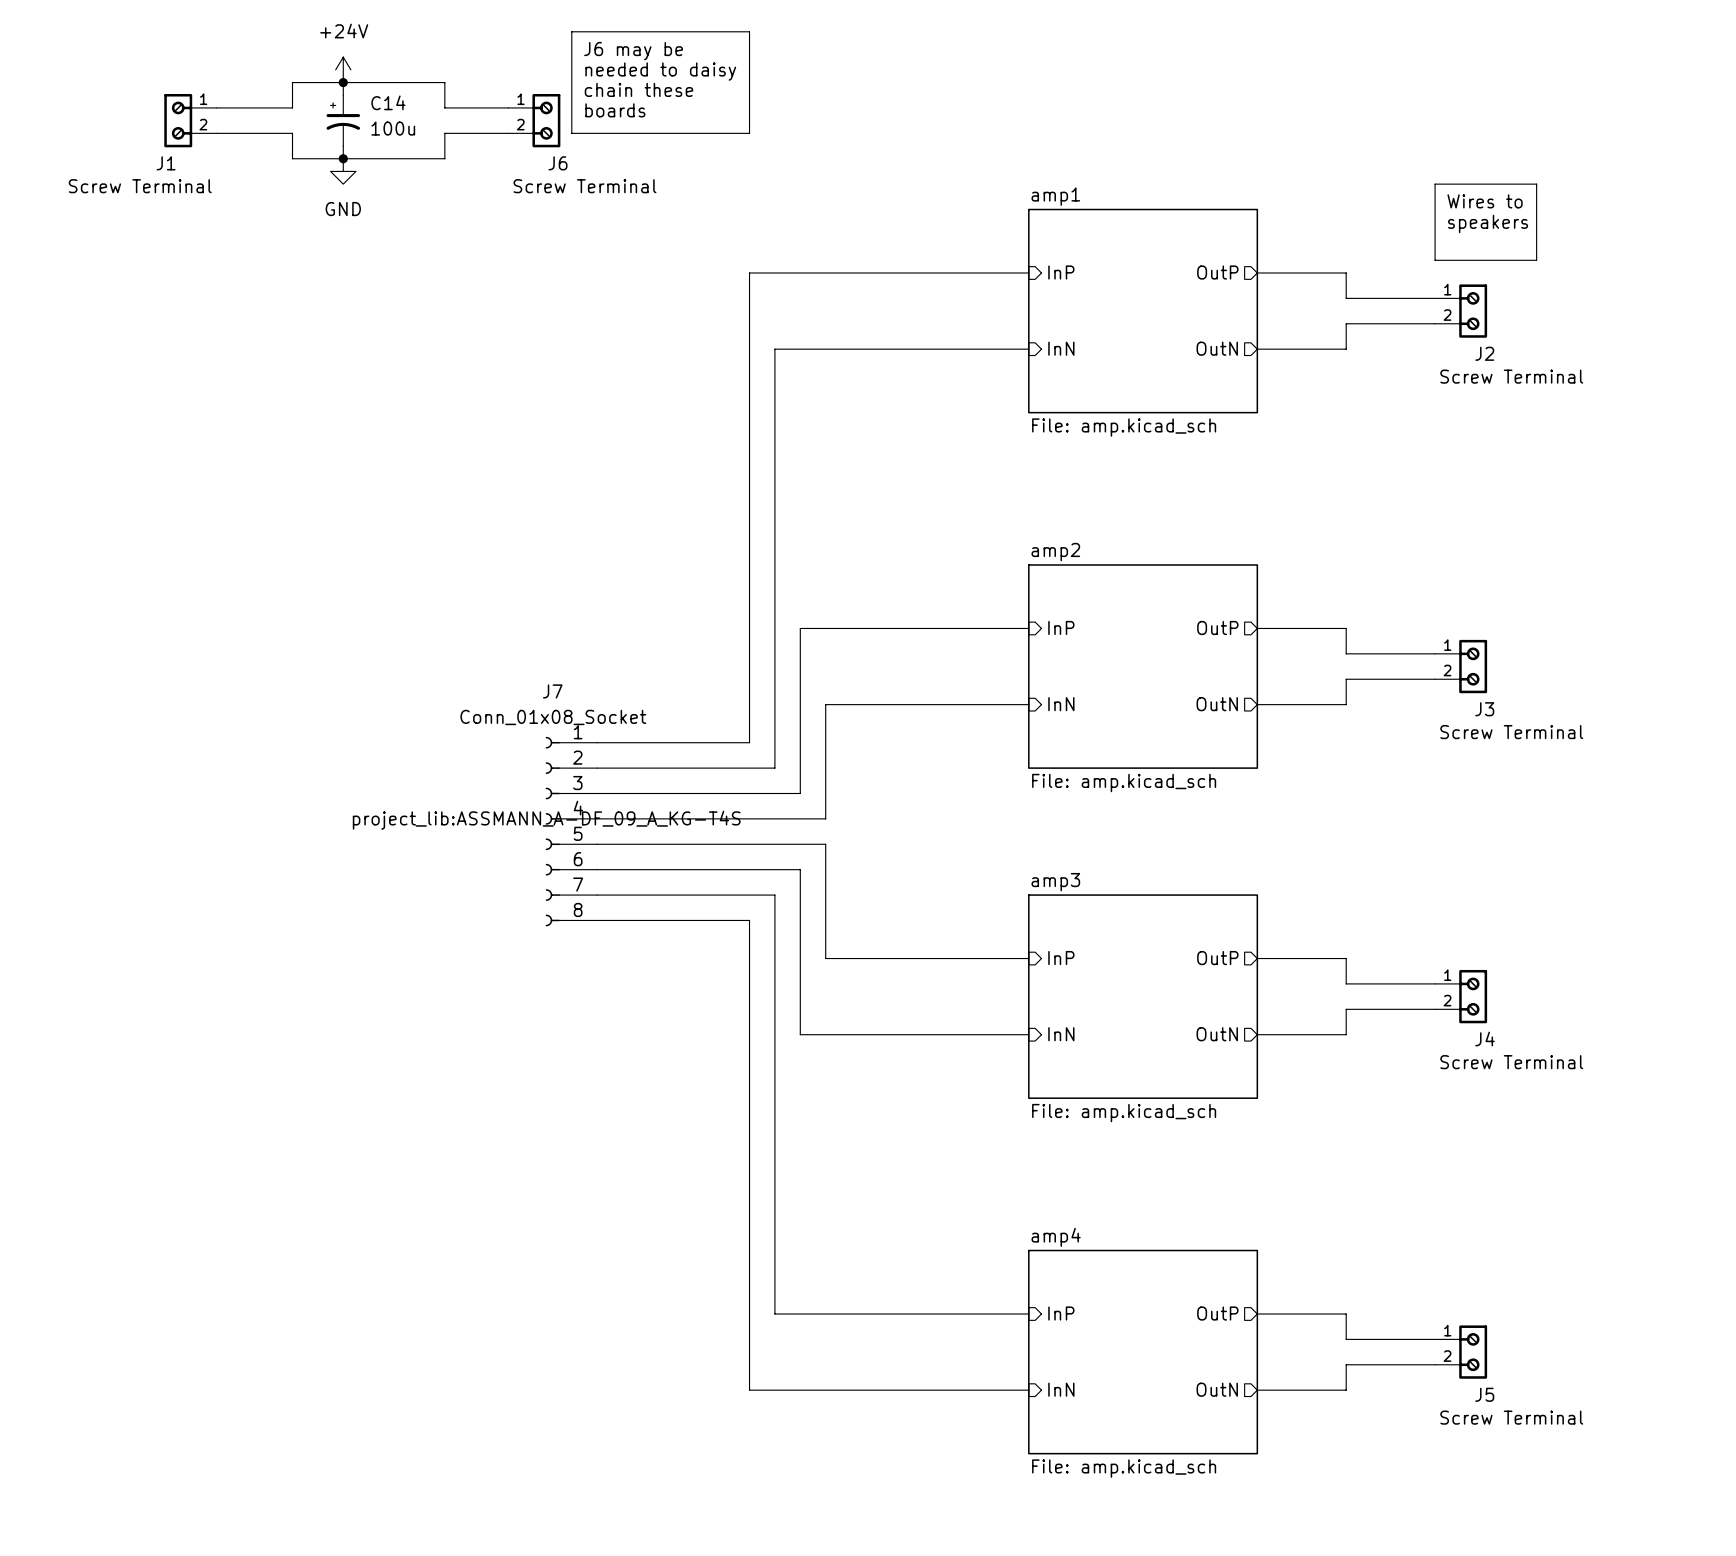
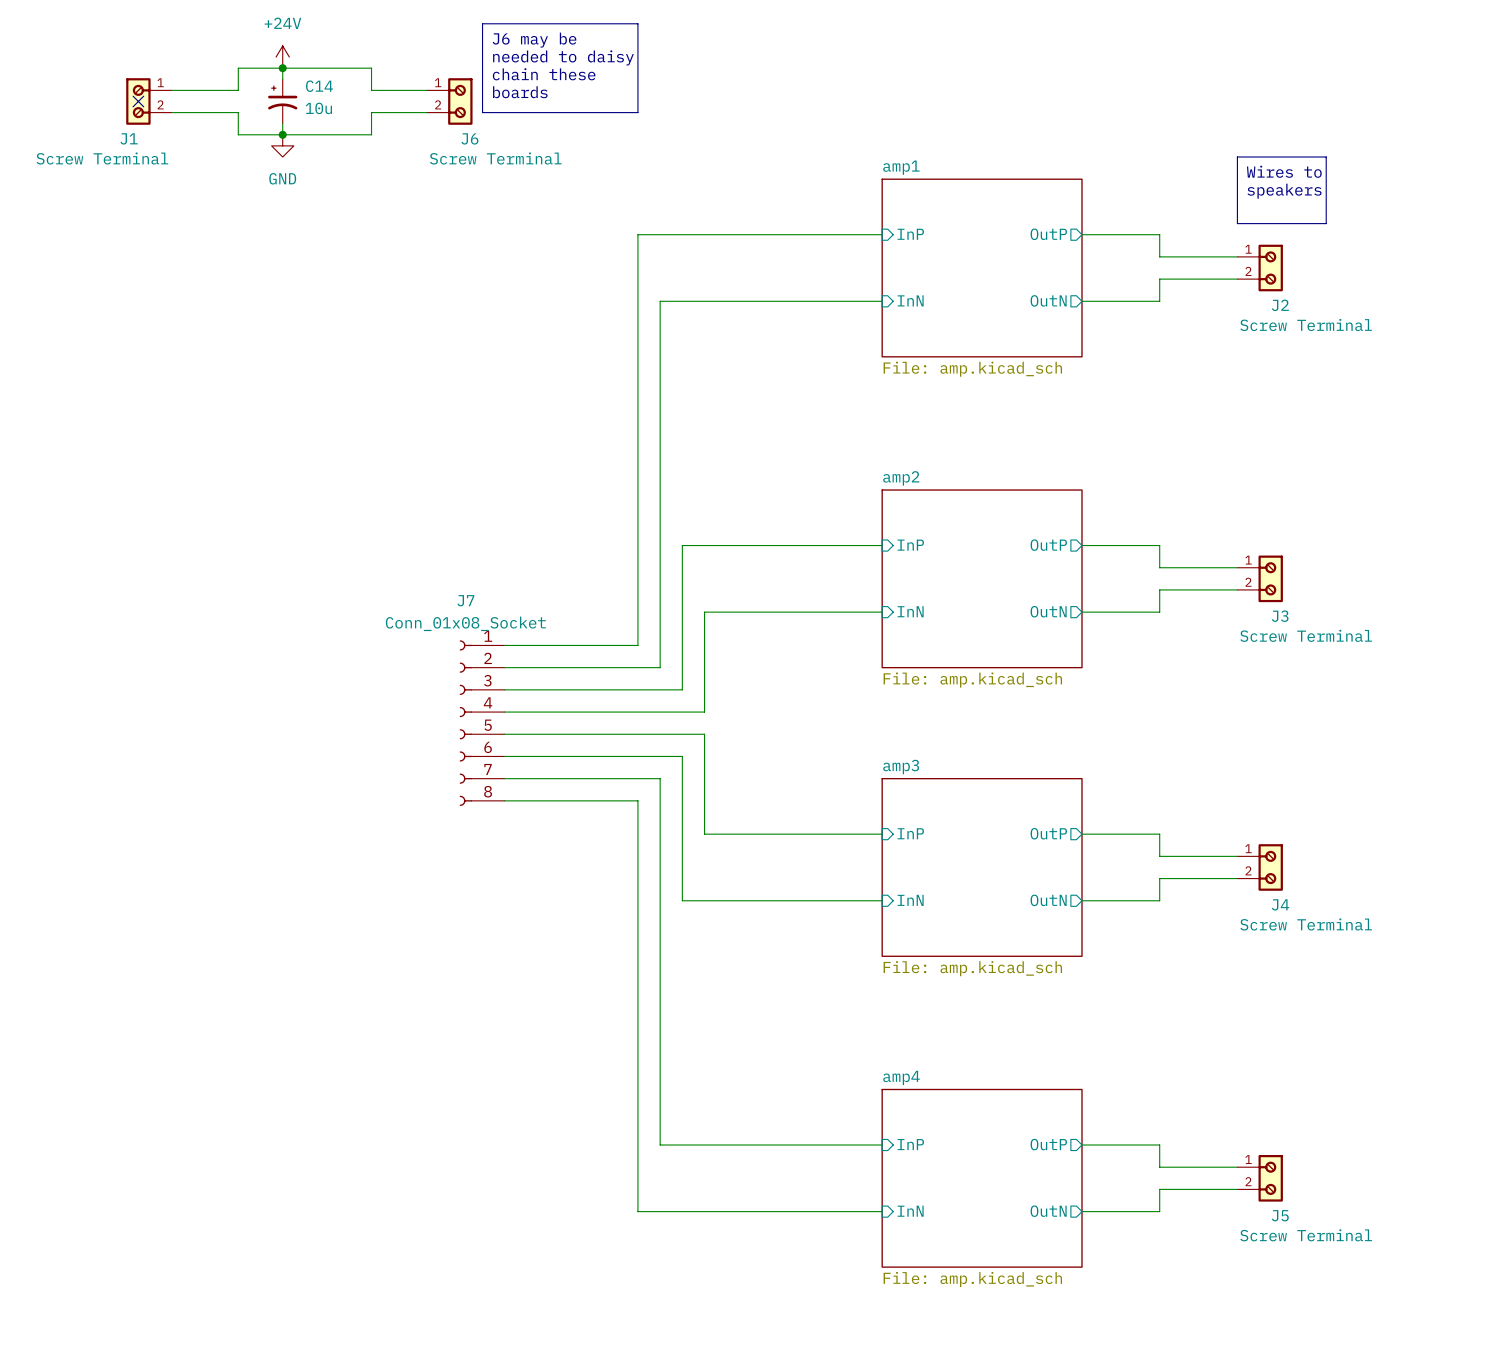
no-connect mark: none -> (138, 101)
C14 value: 100u (393, 128) -> 10u (318, 108)
J7 text: project_lib:ASSMANN_A-DF_09_A_KG-T4S (546, 820) -> none

